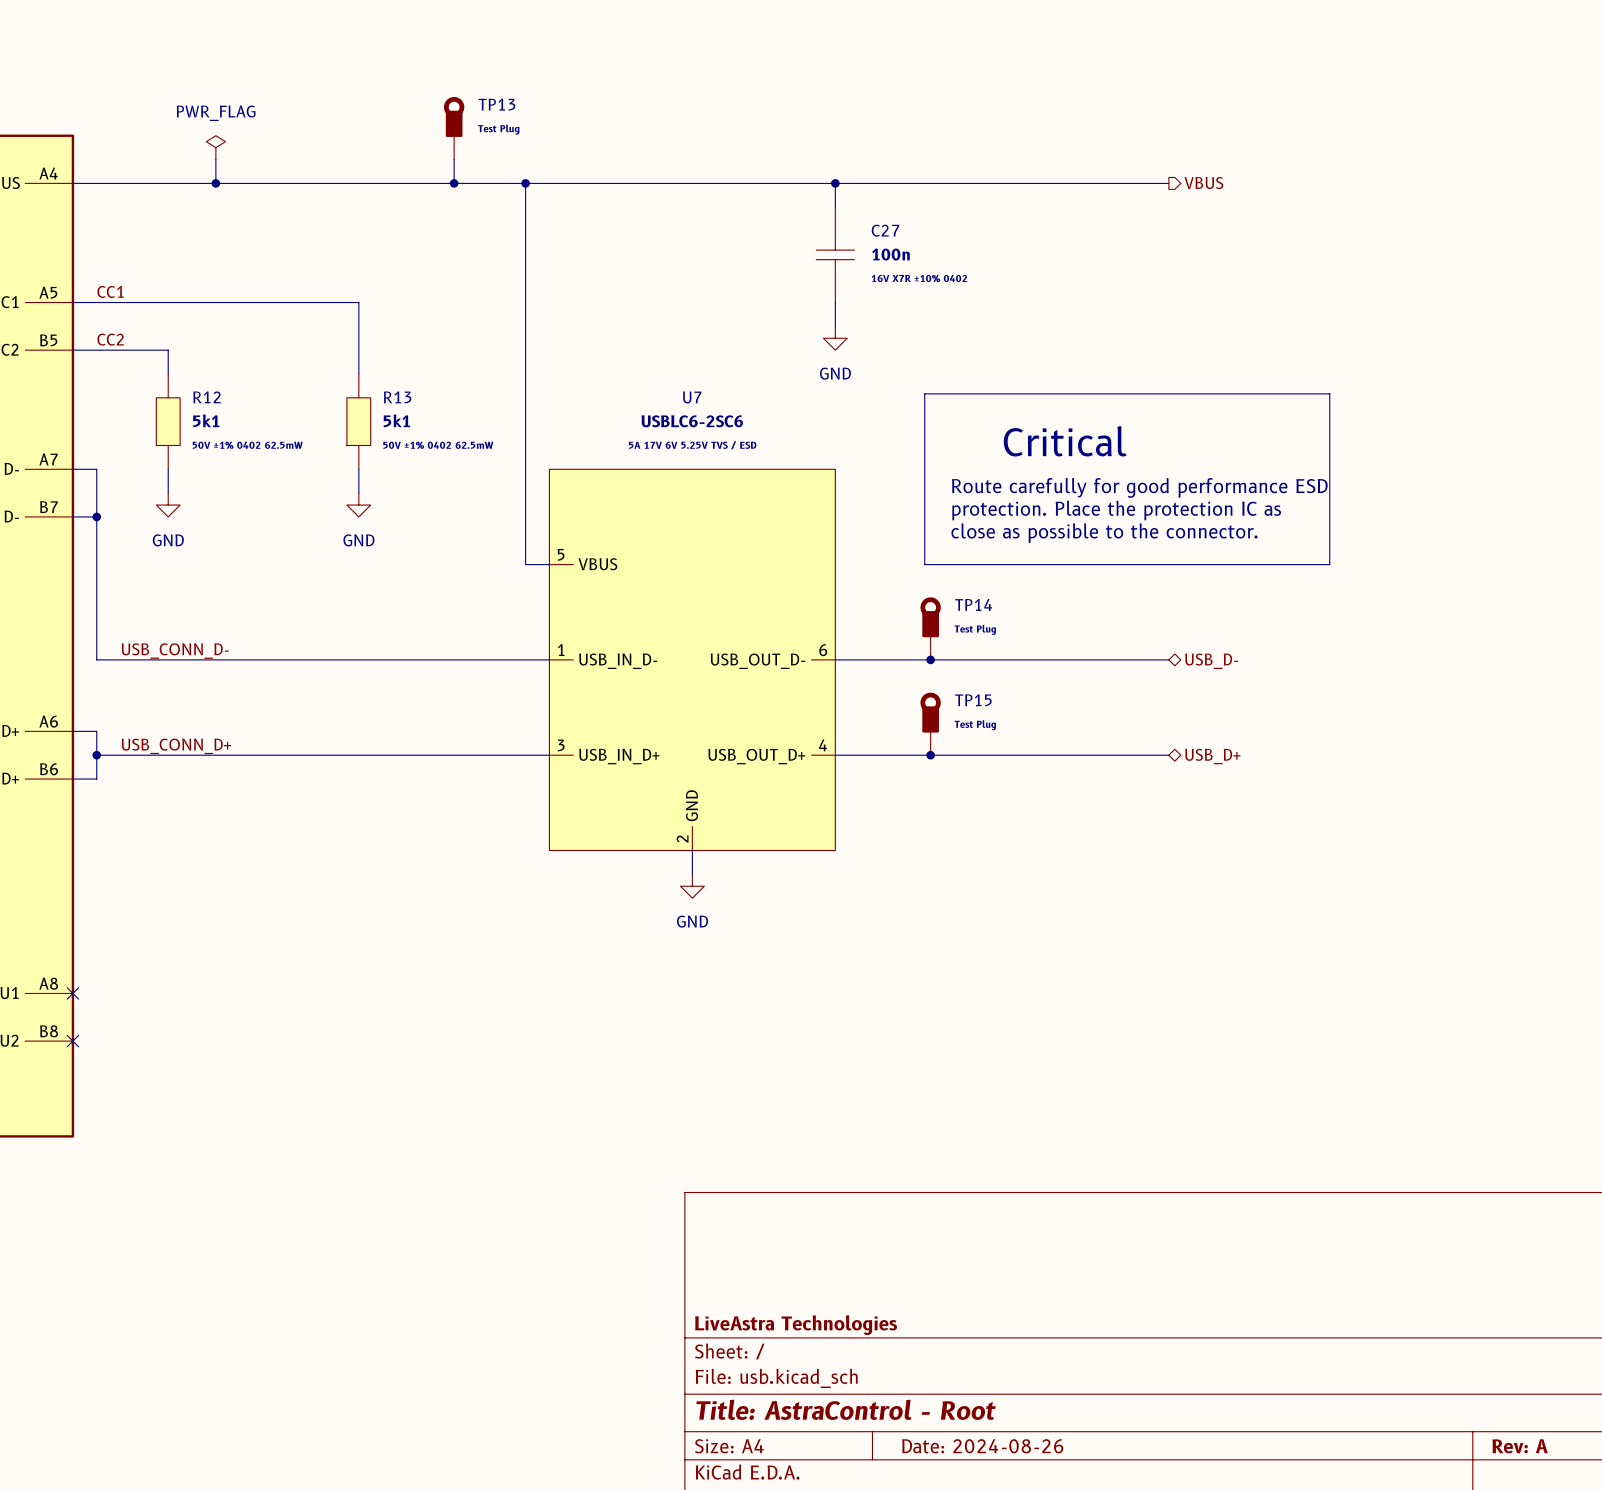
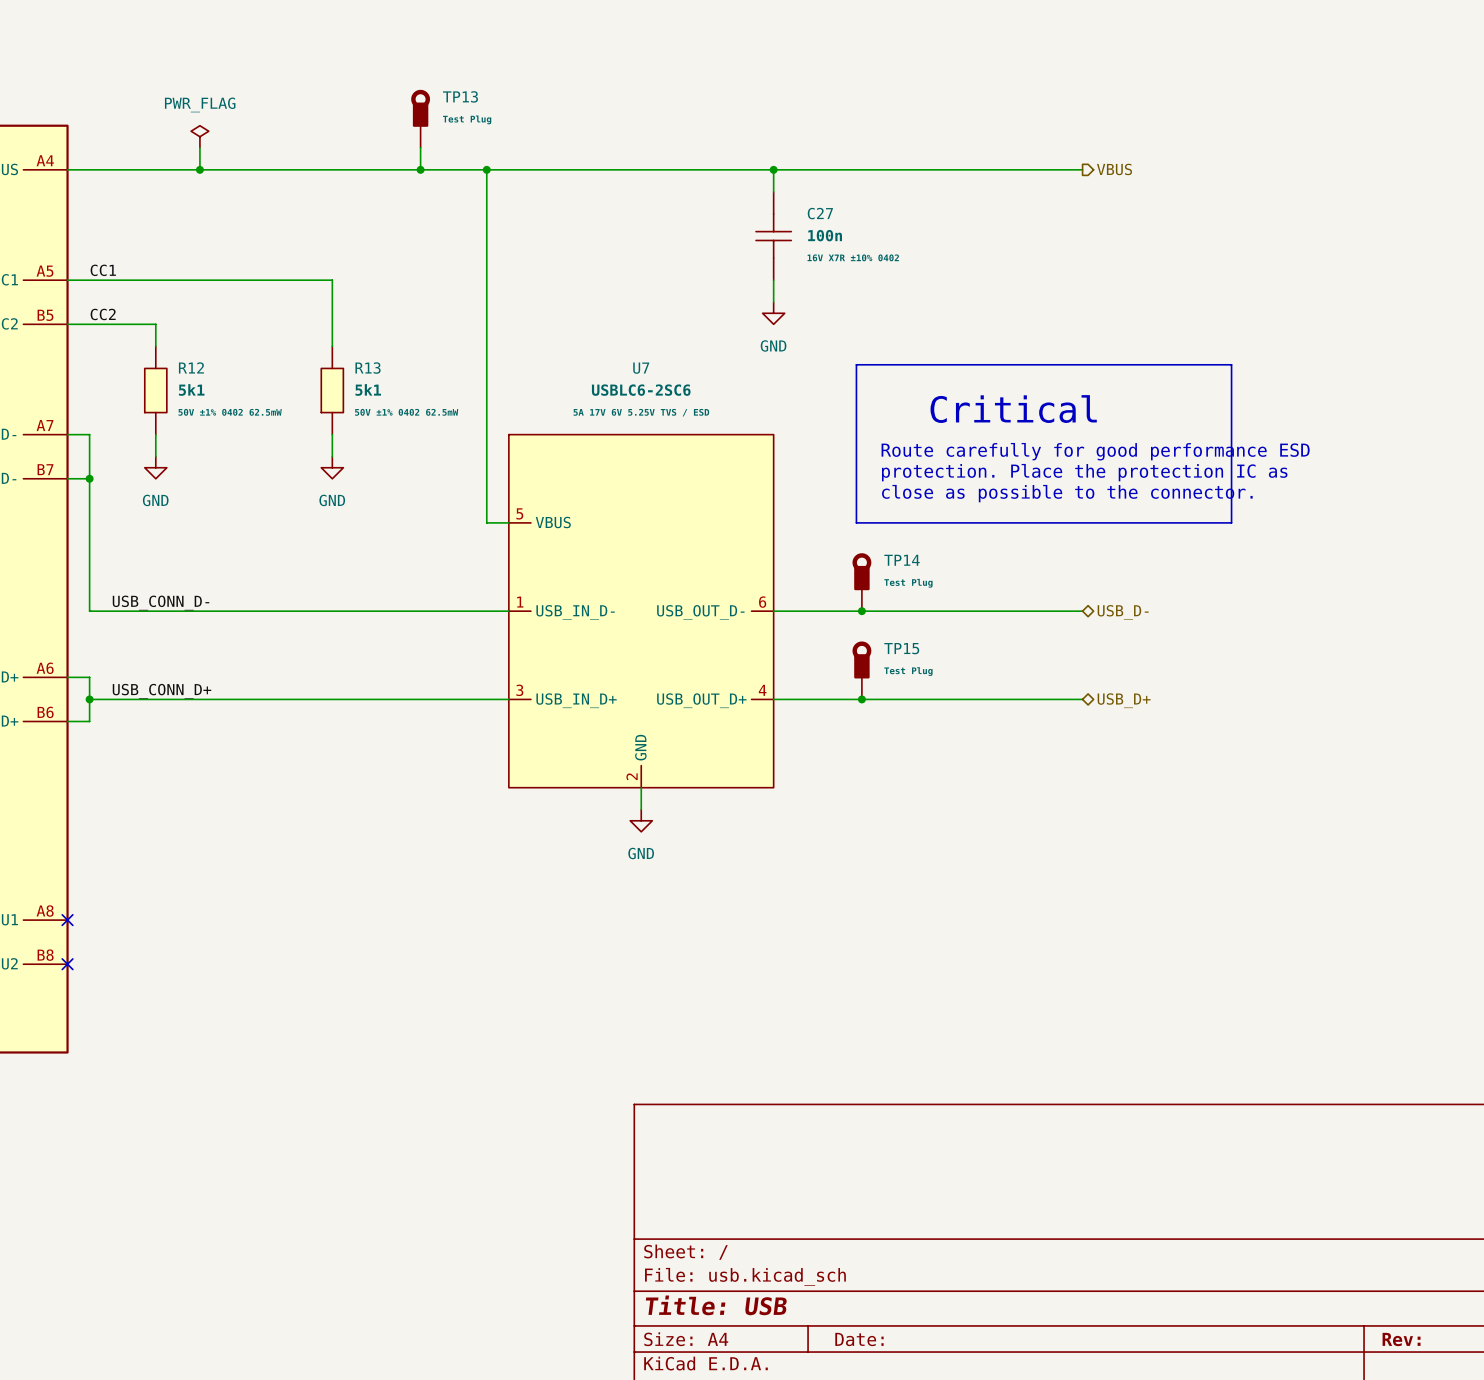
title block: LiveAstra Technologies (796, 1325) -> none
title block: Title: AstraControl - Root (846, 1409) -> Title: USB (716, 1305)
title block: Date: 2024-08-26 (982, 1446) -> Date: (859, 1339)
title block: Rev: A (1520, 1446) -> Rev: (1401, 1339)

